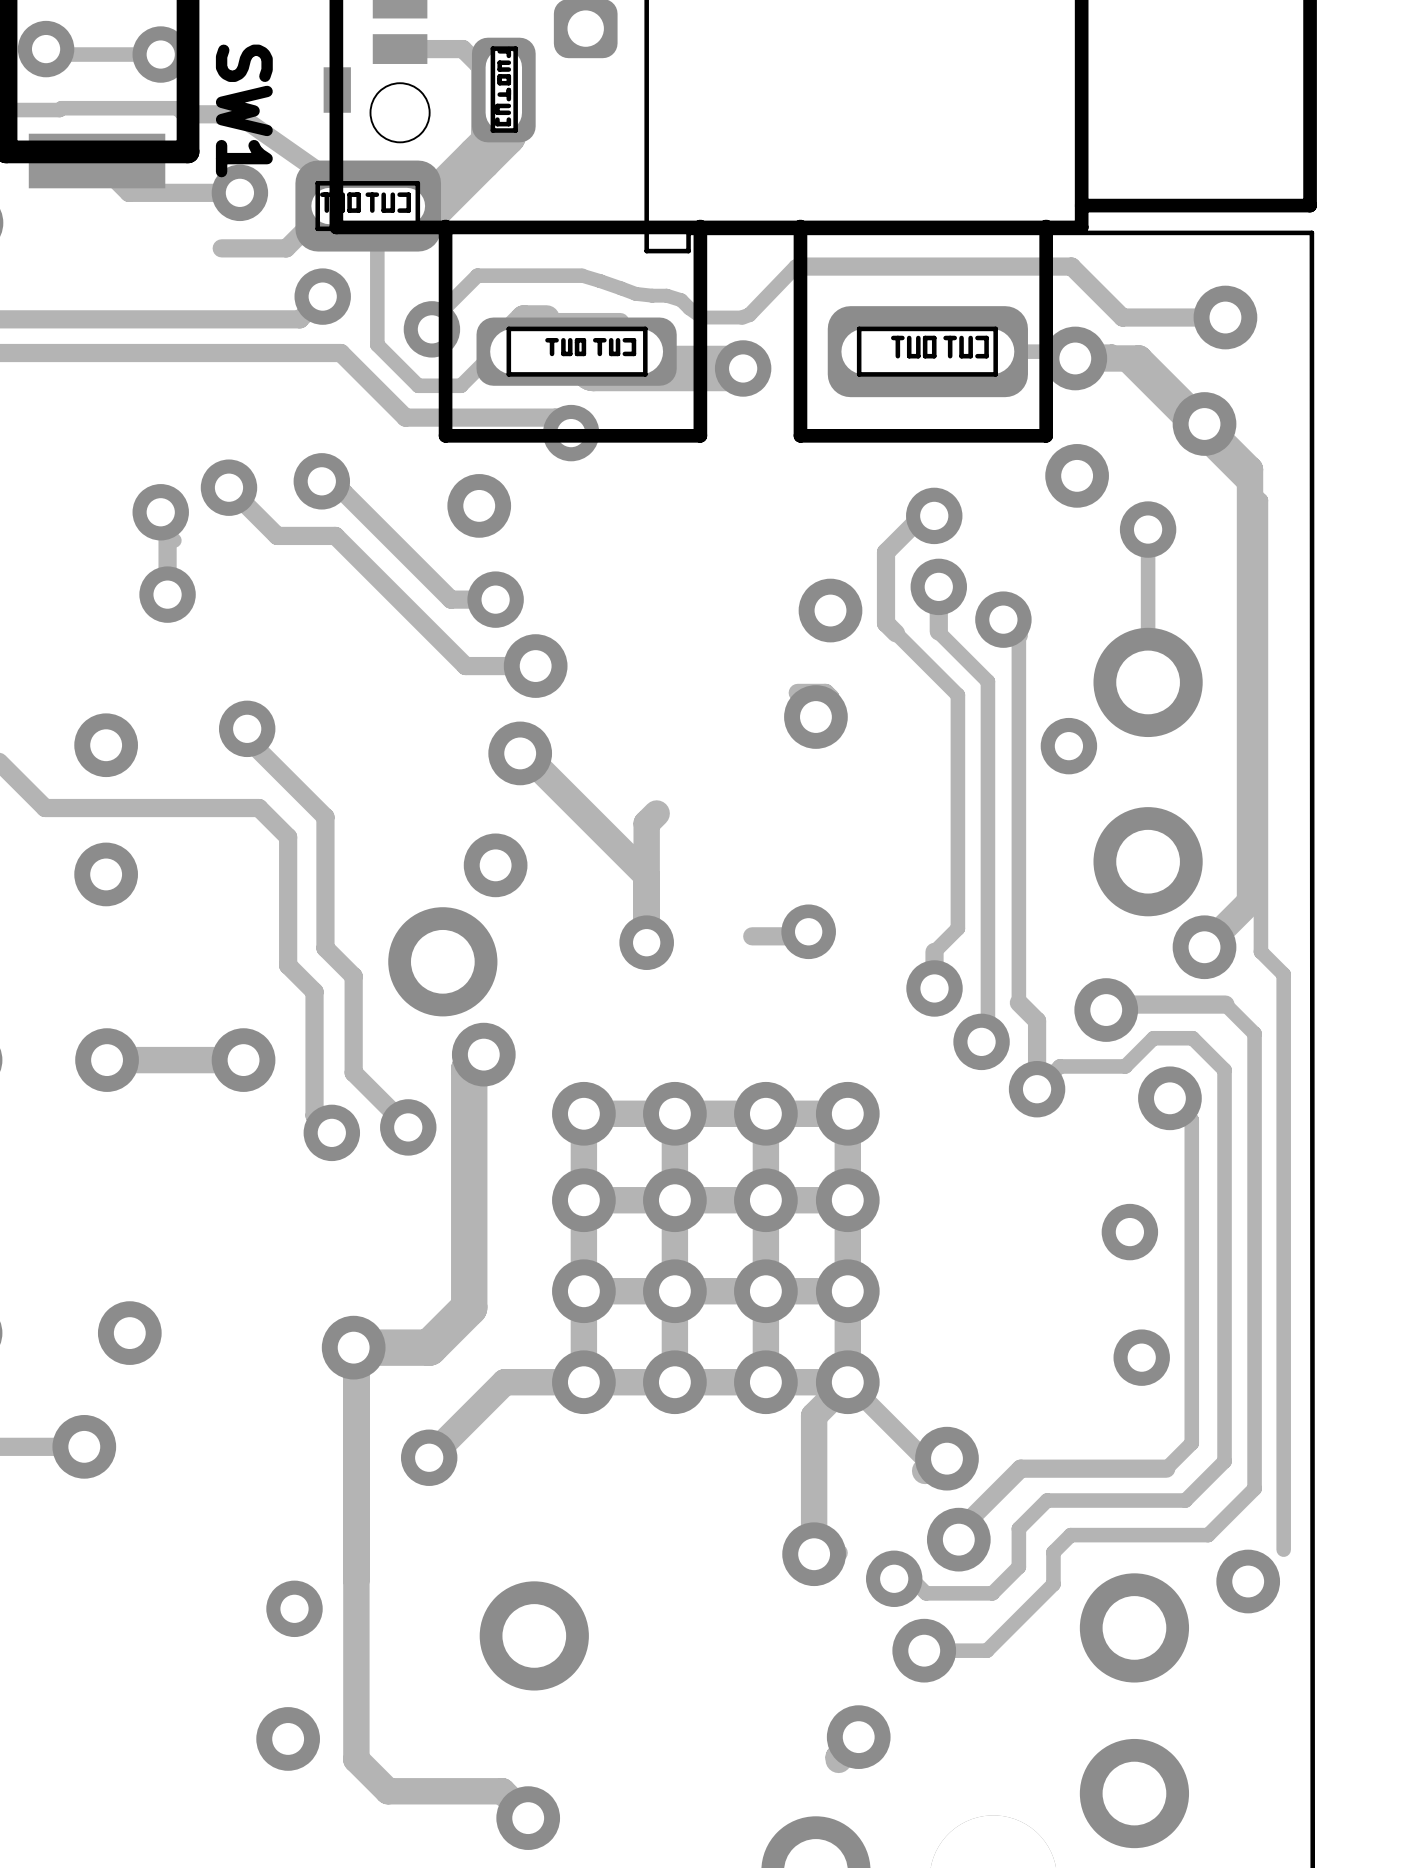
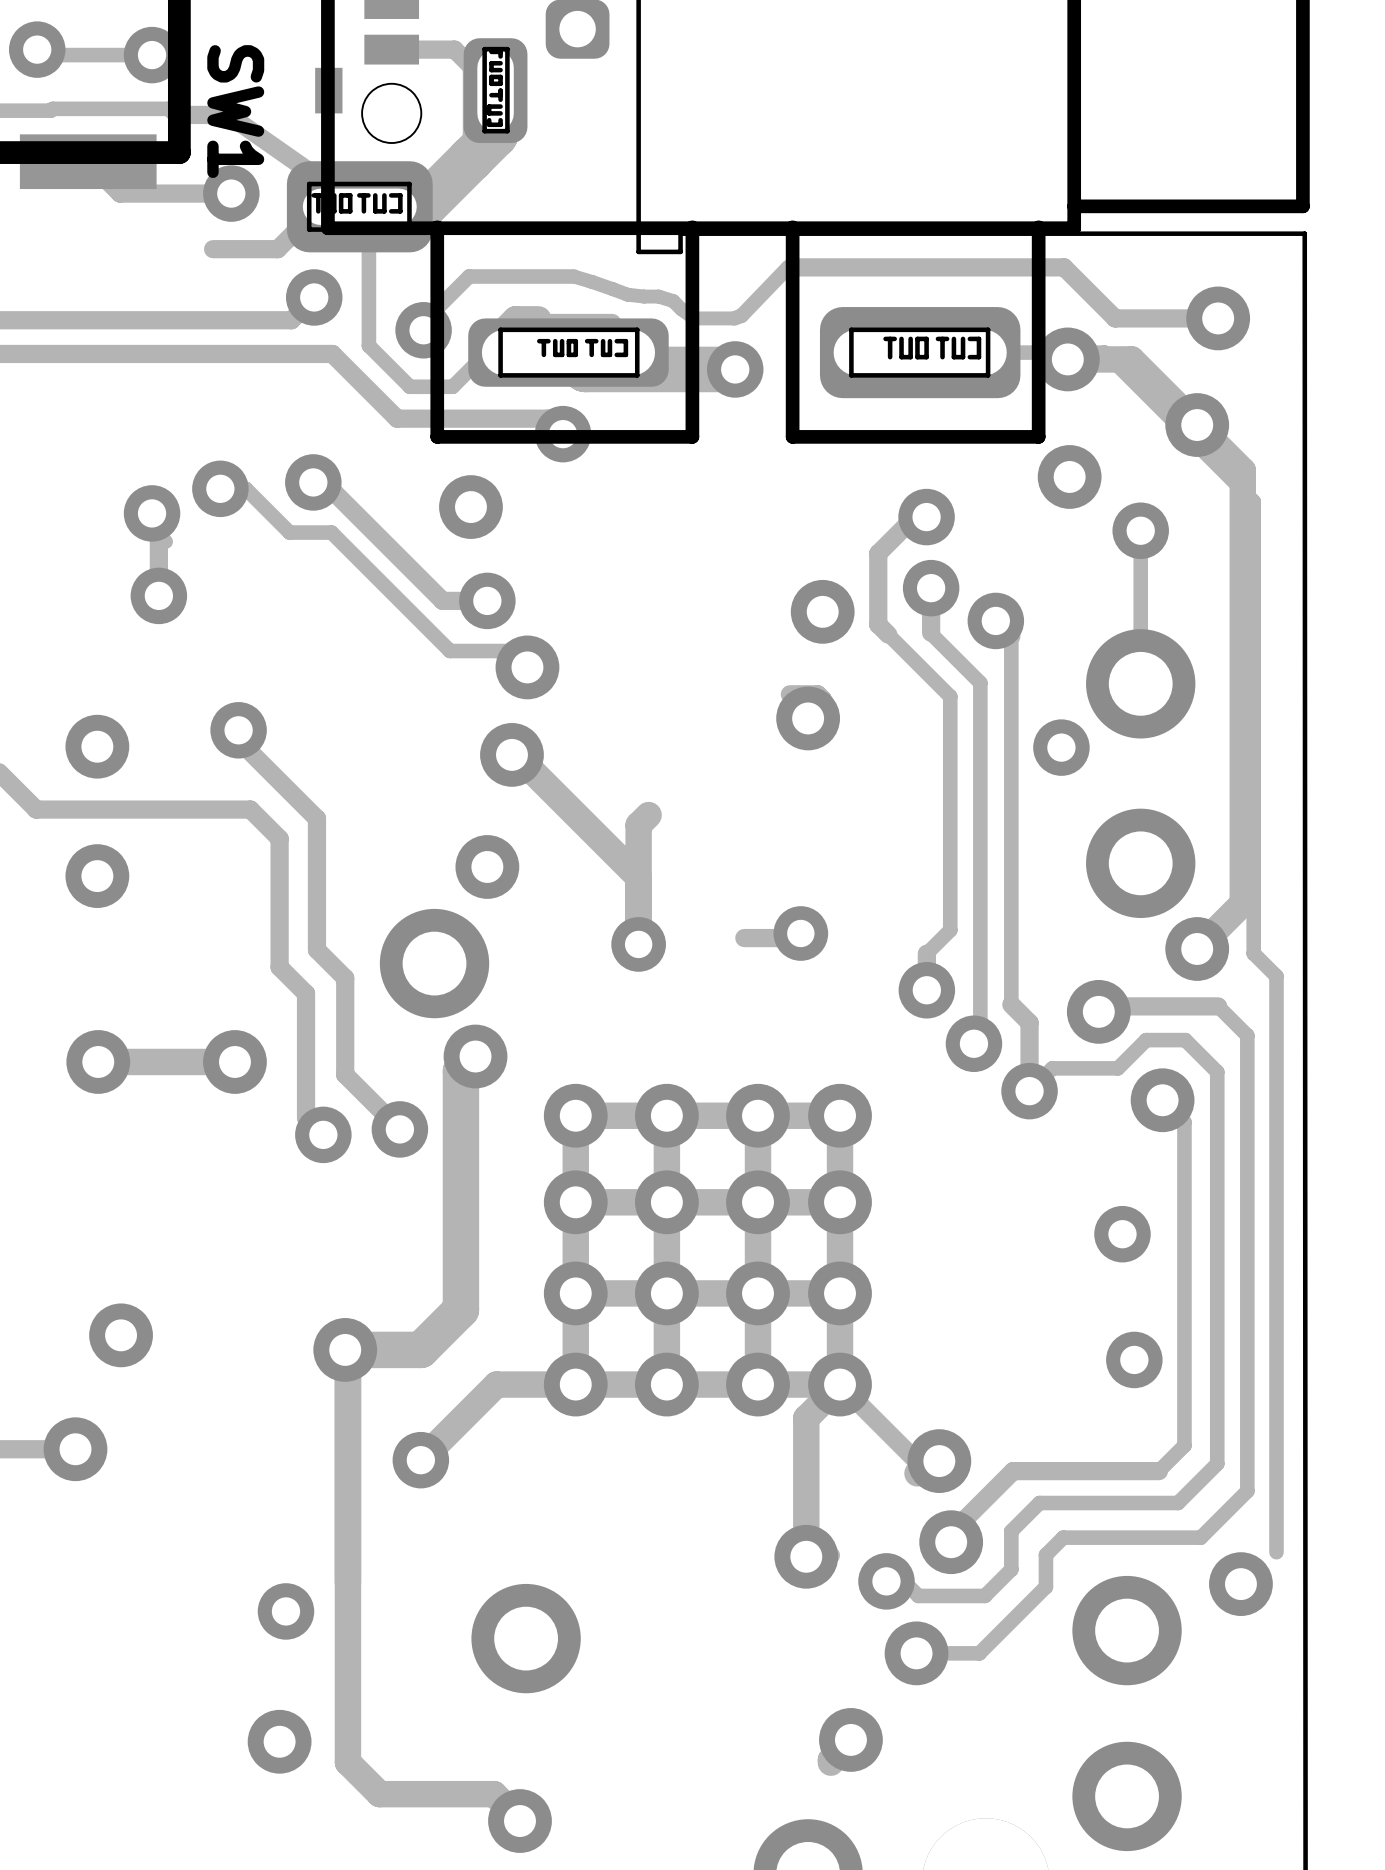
track: (228, 487) (277, 535) (335, 535) (465, 666) (535, 666) -> (220, 488) (245, 488) (289, 532) (331, 532) (450, 651) (511, 651) (527, 667)

